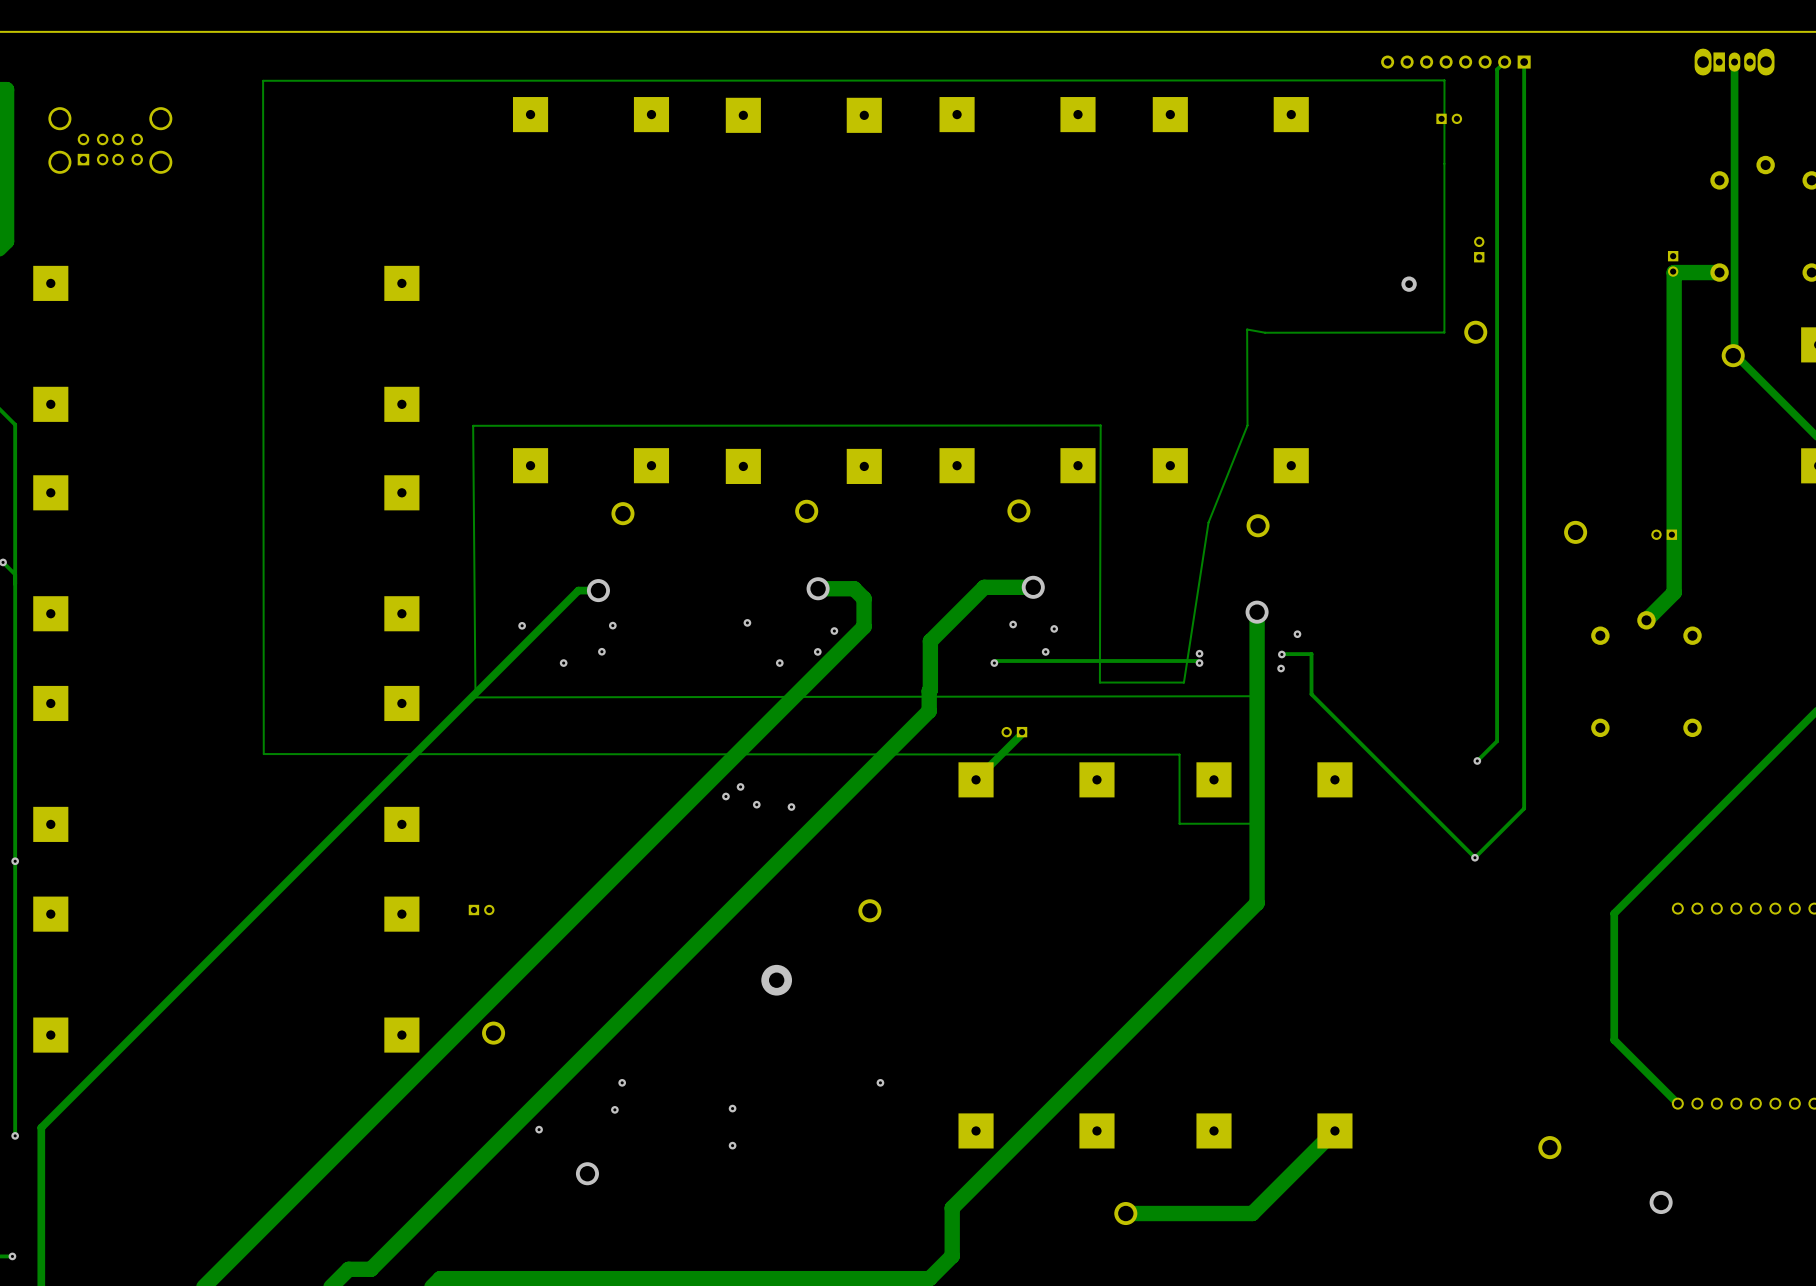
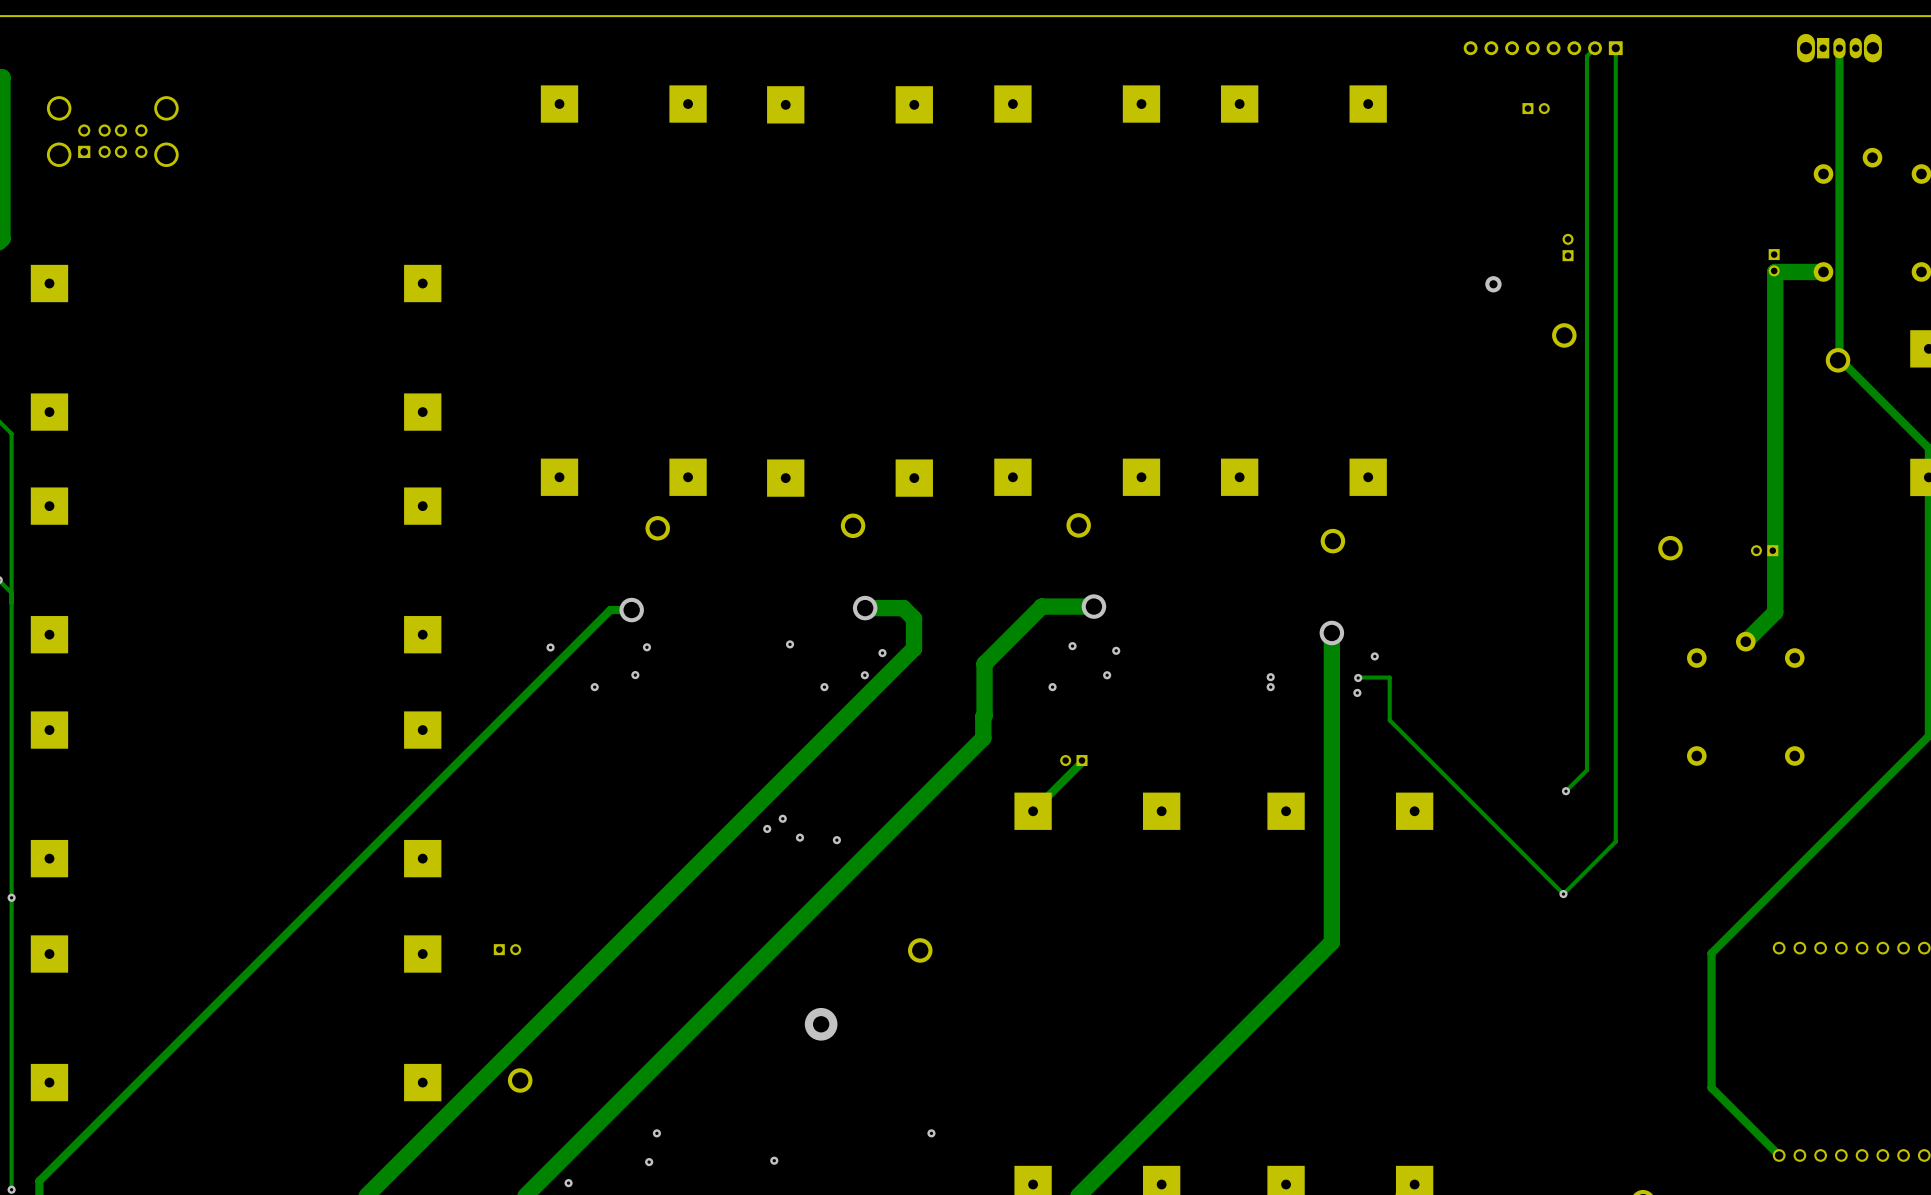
track: (1444, 80) (1444, 332) (1265, 332) (1247, 329) (1247, 425) (1208, 522) (1183, 682) (1099, 682) (1100, 425) (473, 425) (475, 697) (1251, 696) (1251, 823) (1179, 823) (1179, 754) (263, 754) (263, 80) (1444, 80) -> none
track: (1199, 663) (1197, 661) (996, 661) (994, 663) -> none

